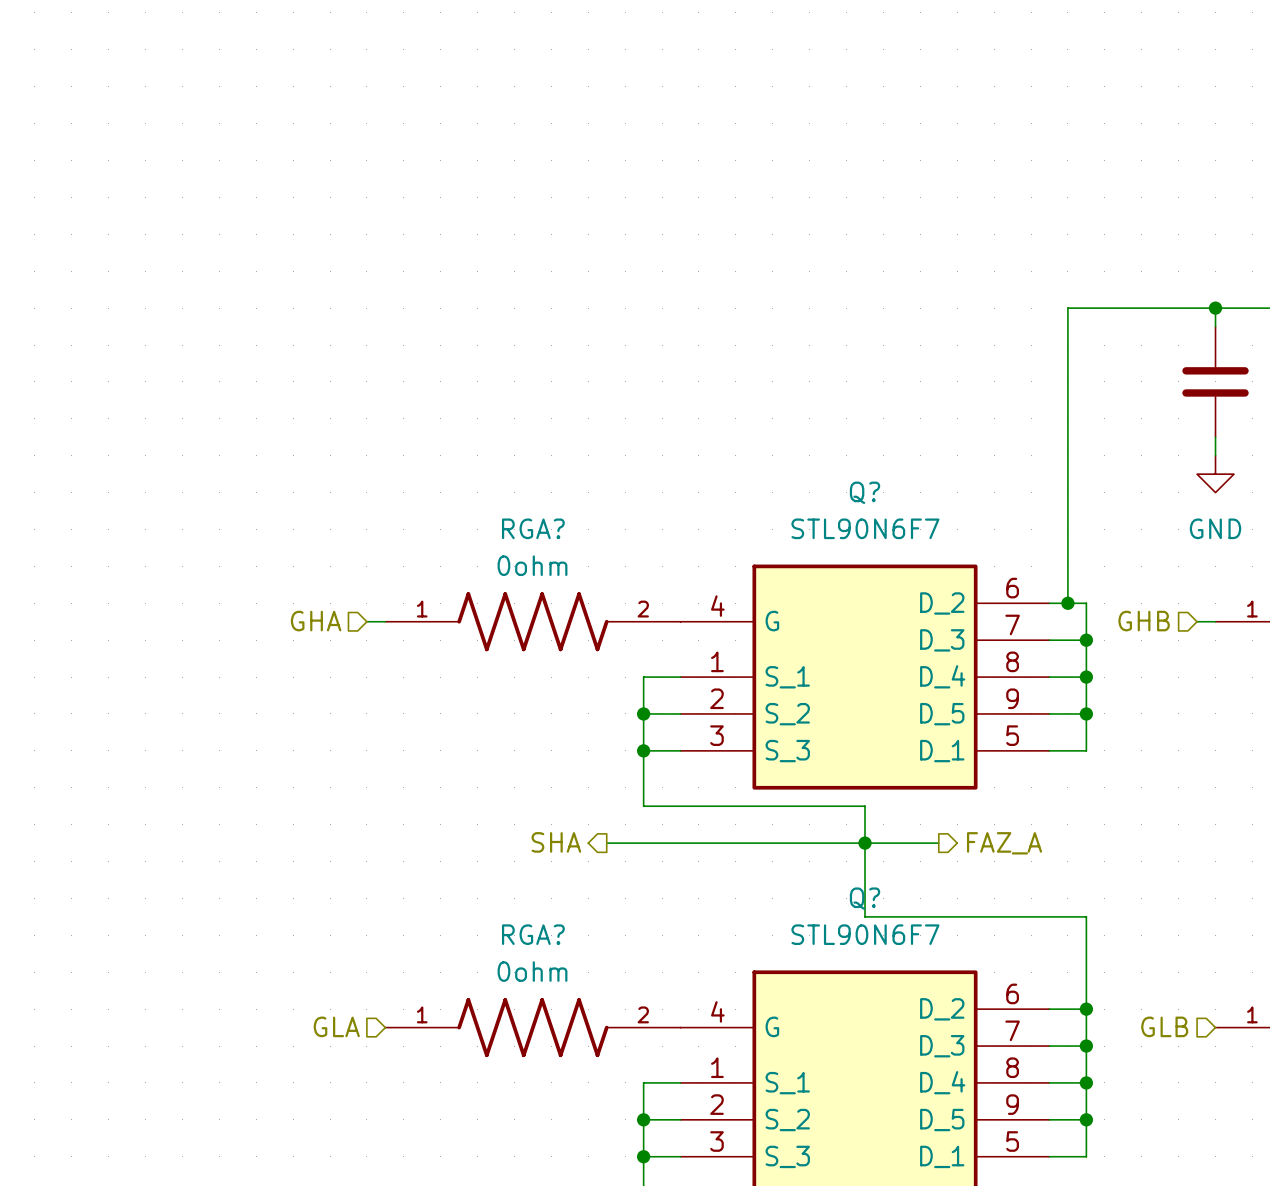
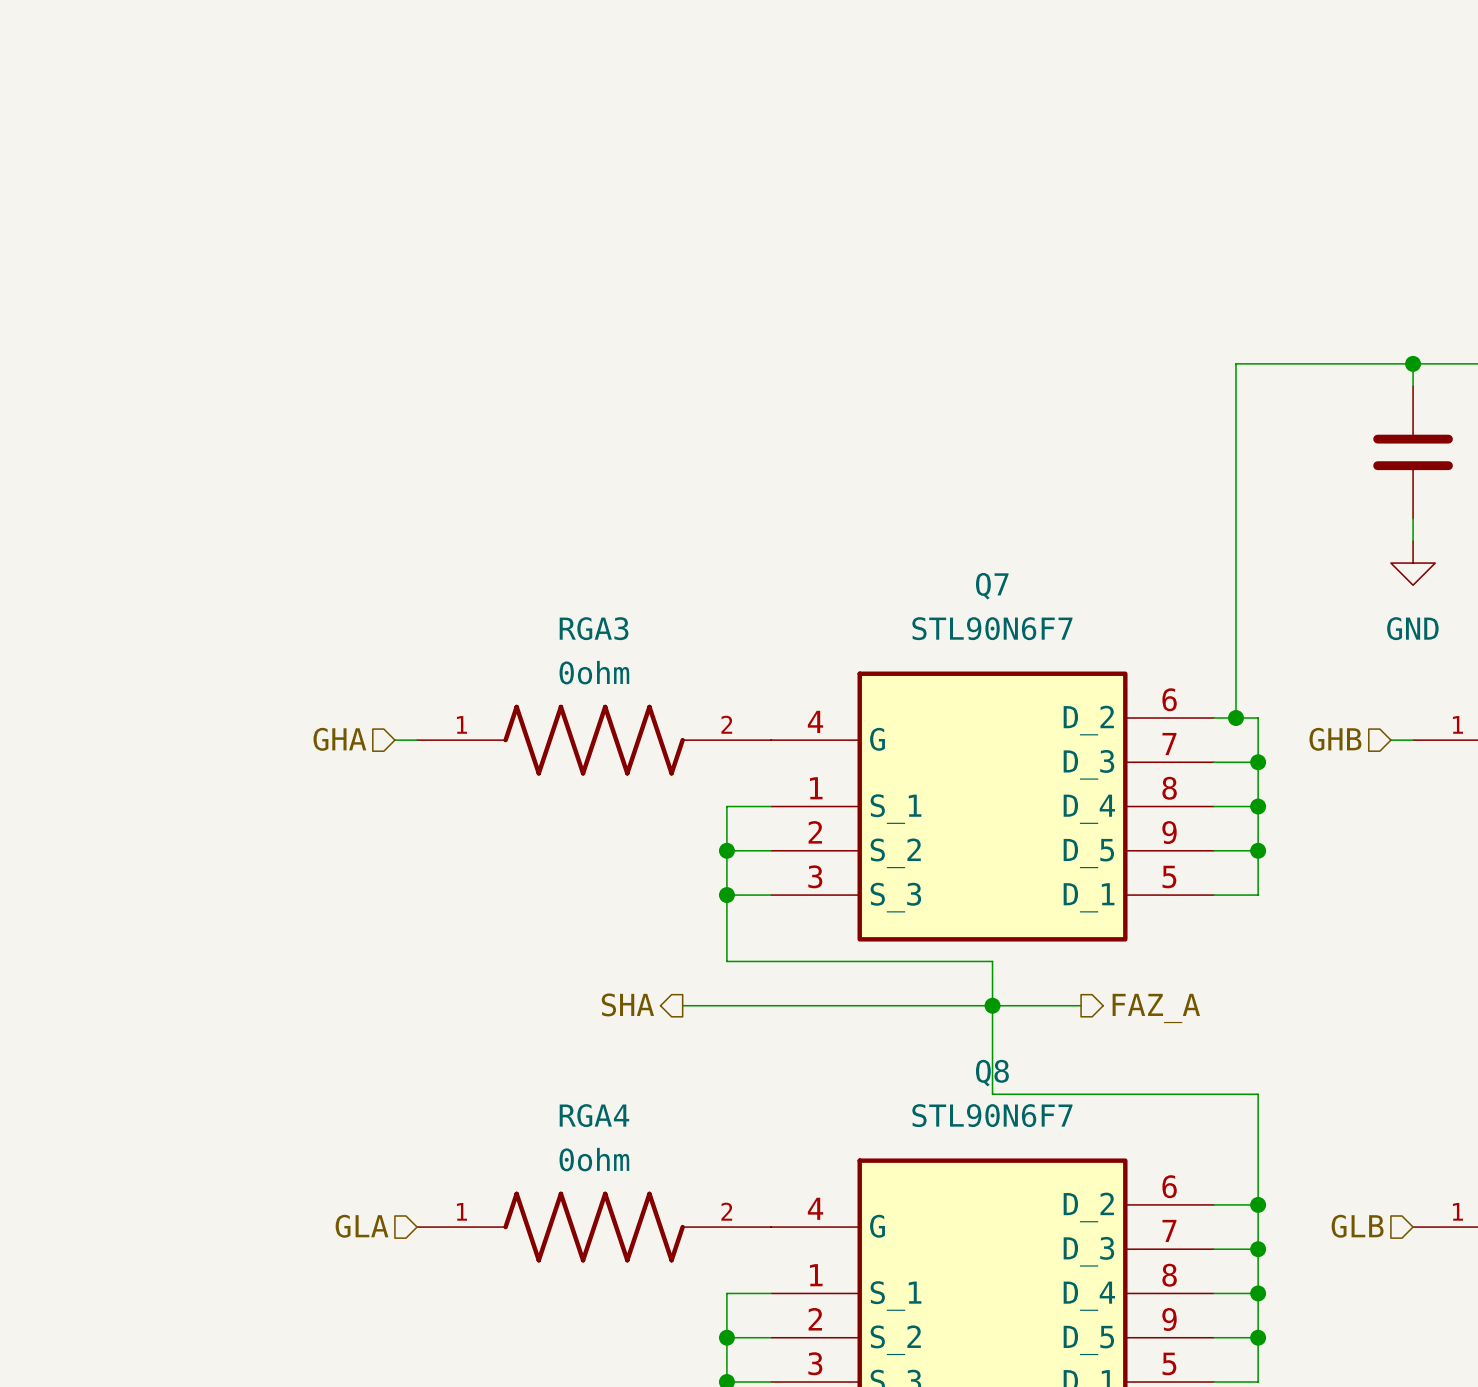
Q? name: Q? (865, 492) -> Q7 (992, 586)
RGA? name: RGA? (533, 528) -> RGA3 (594, 628)
Q? name: Q? (865, 898) -> Q8 (992, 1073)
RGA? name: RGA? (533, 934) -> RGA4 (594, 1115)

